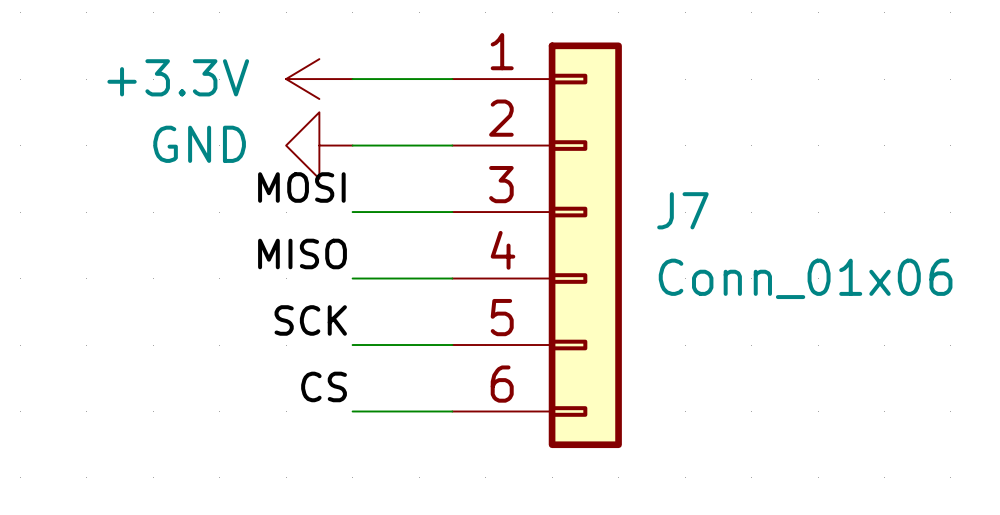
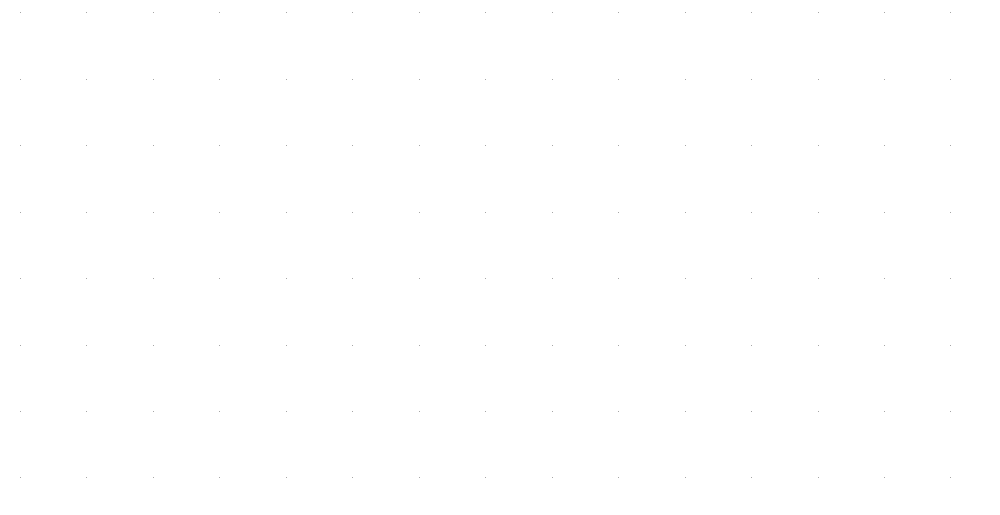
power symbol: +3.3V (319, 79) -> none
wire: (352, 79) (452, 79) -> none
power symbol: GND (319, 145) -> none
wire: (352, 145) (452, 145) -> none
label: MOSI (301, 187) -> none
wire: (352, 212) (452, 212) -> none
J7: Conn_01x06 (537, 245) -> none
label: MISO (302, 253) -> none
wire: (352, 278) (452, 278) -> none
label: SCK (310, 320) -> none
wire: (352, 345) (452, 345) -> none
label: CS (324, 386) -> none
wire: (352, 411) (452, 411) -> none

